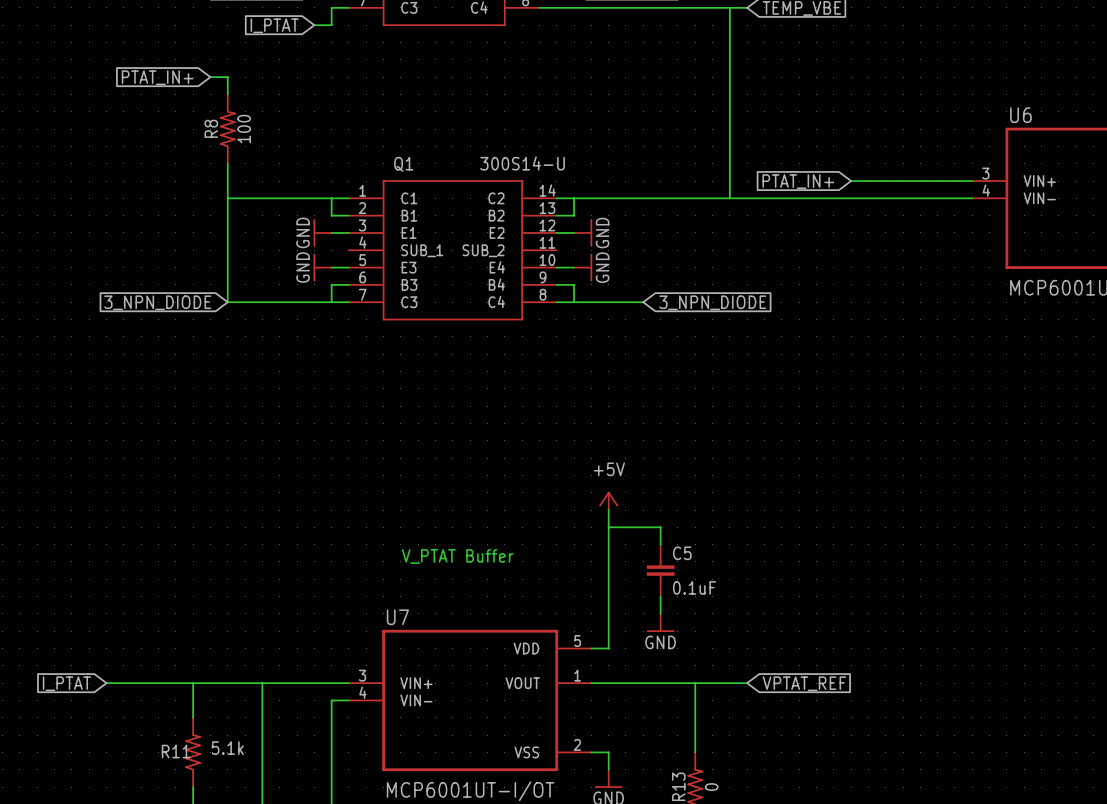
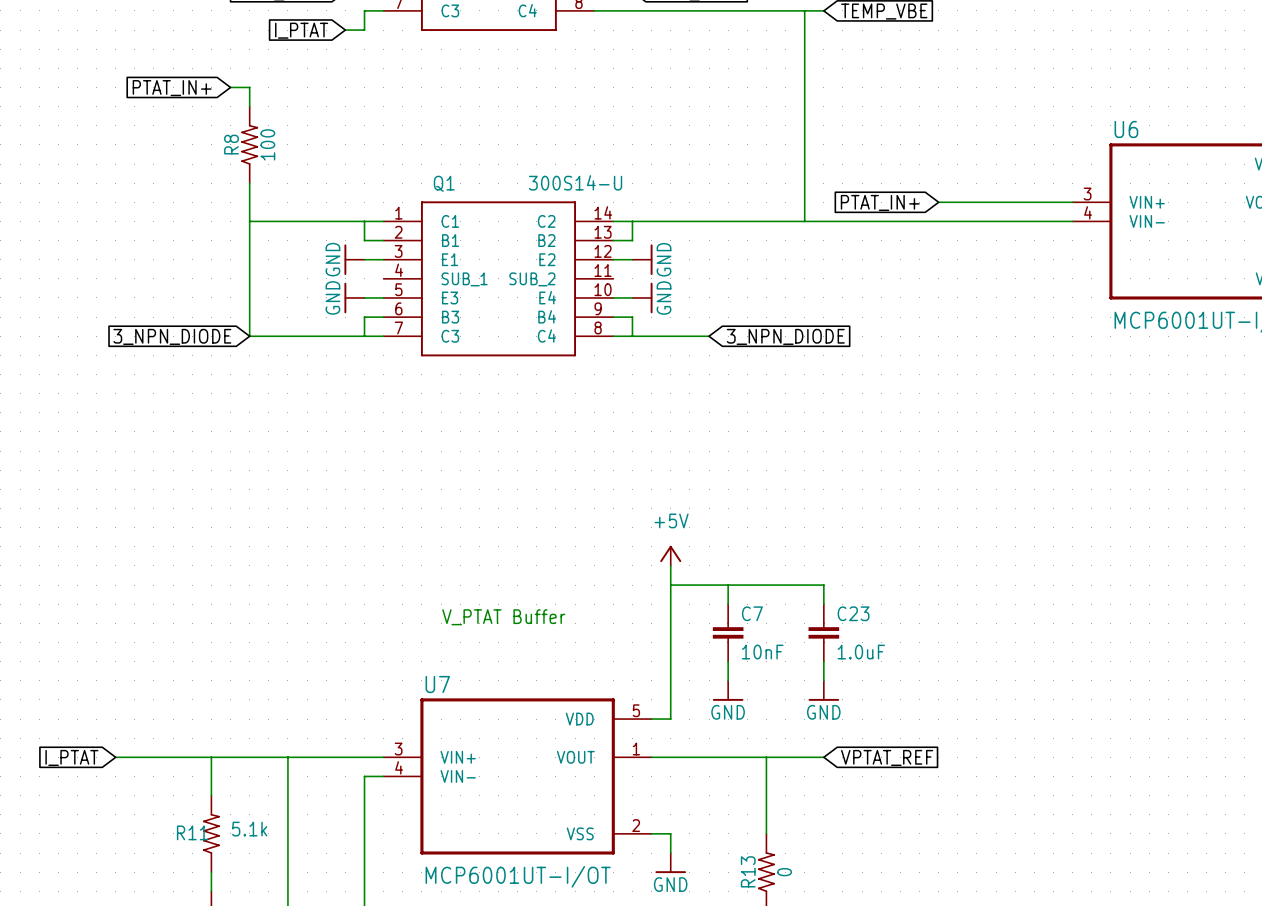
wire: none -> (728, 585) (823, 585) (823, 604)
C5 name: C5 (682, 553) -> C7 (752, 613)
C23: none -> 1.0uF (823, 632)
C5 value: 0.1uF (694, 587) -> 10nF (762, 652)
wire: none -> (823, 661) (823, 680)
power symbol: none -> GND (823, 690)

